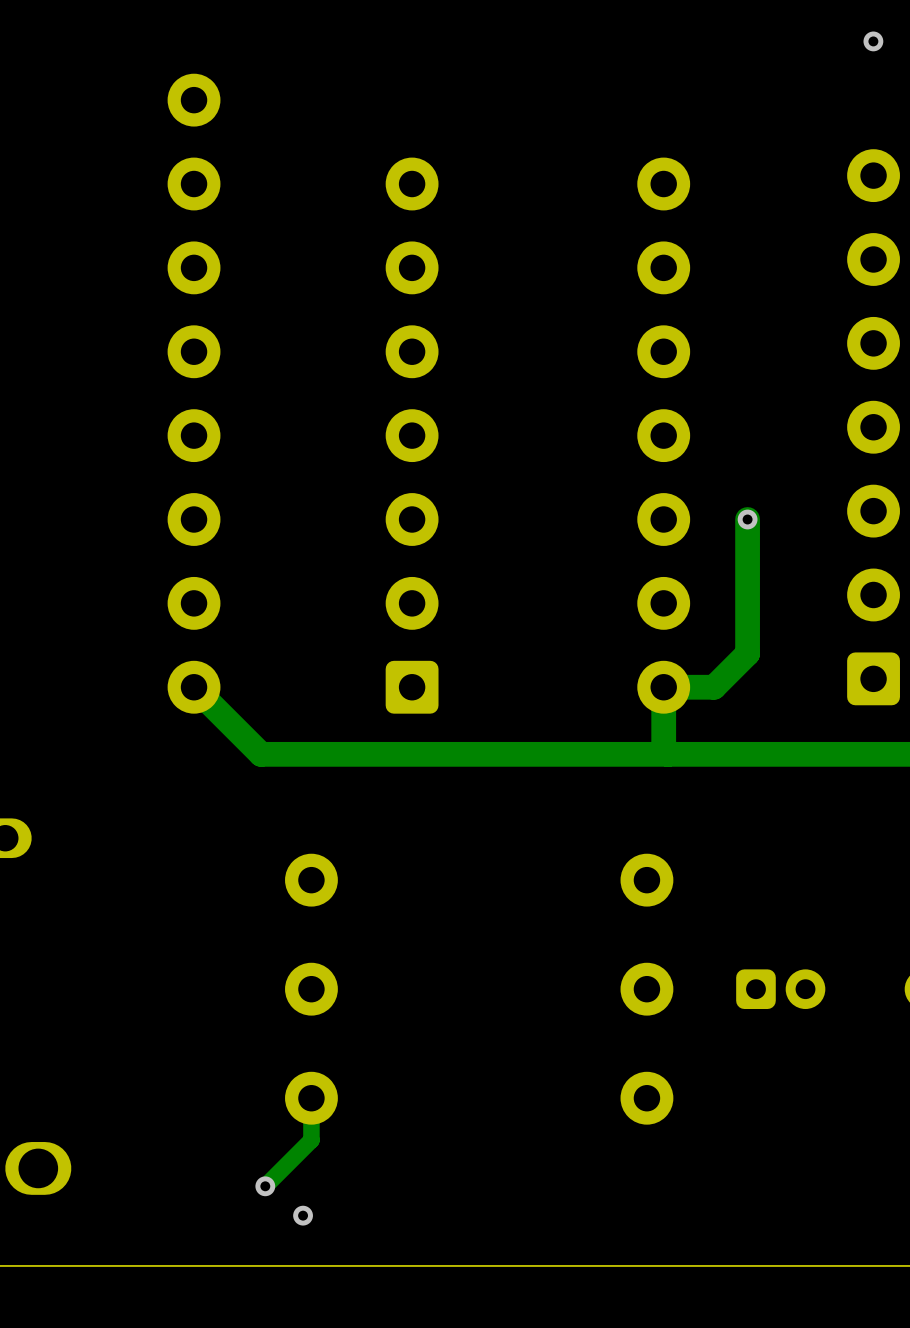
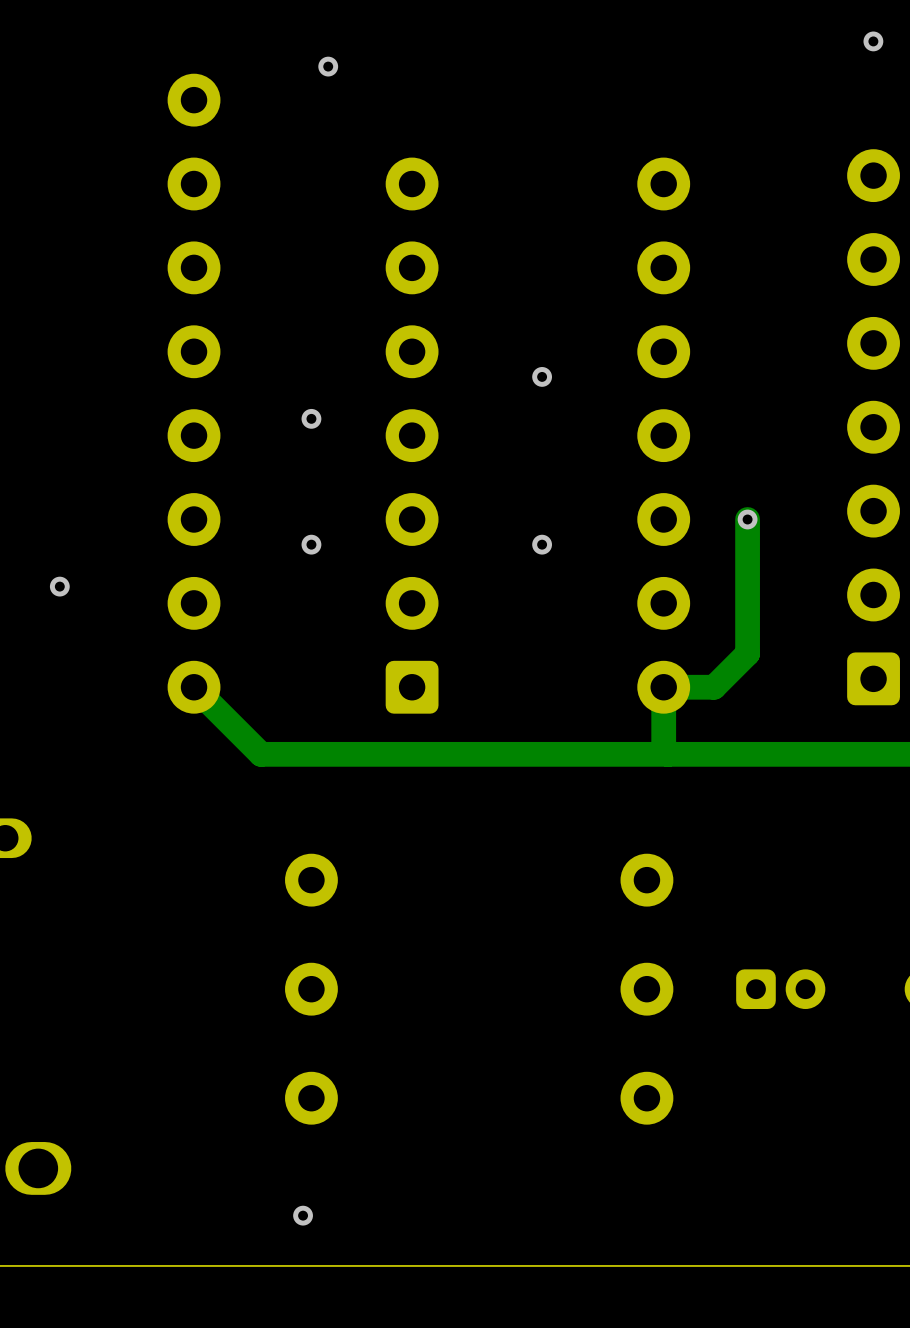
via: none -> (328, 66)
via: none -> (542, 376)
via: none -> (311, 418)
via: none -> (311, 544)
via: none -> (542, 544)
via: none -> (59, 586)
track: (311, 1098) (311, 1140) (265, 1186) -> none
via: (265, 1186) -> none

